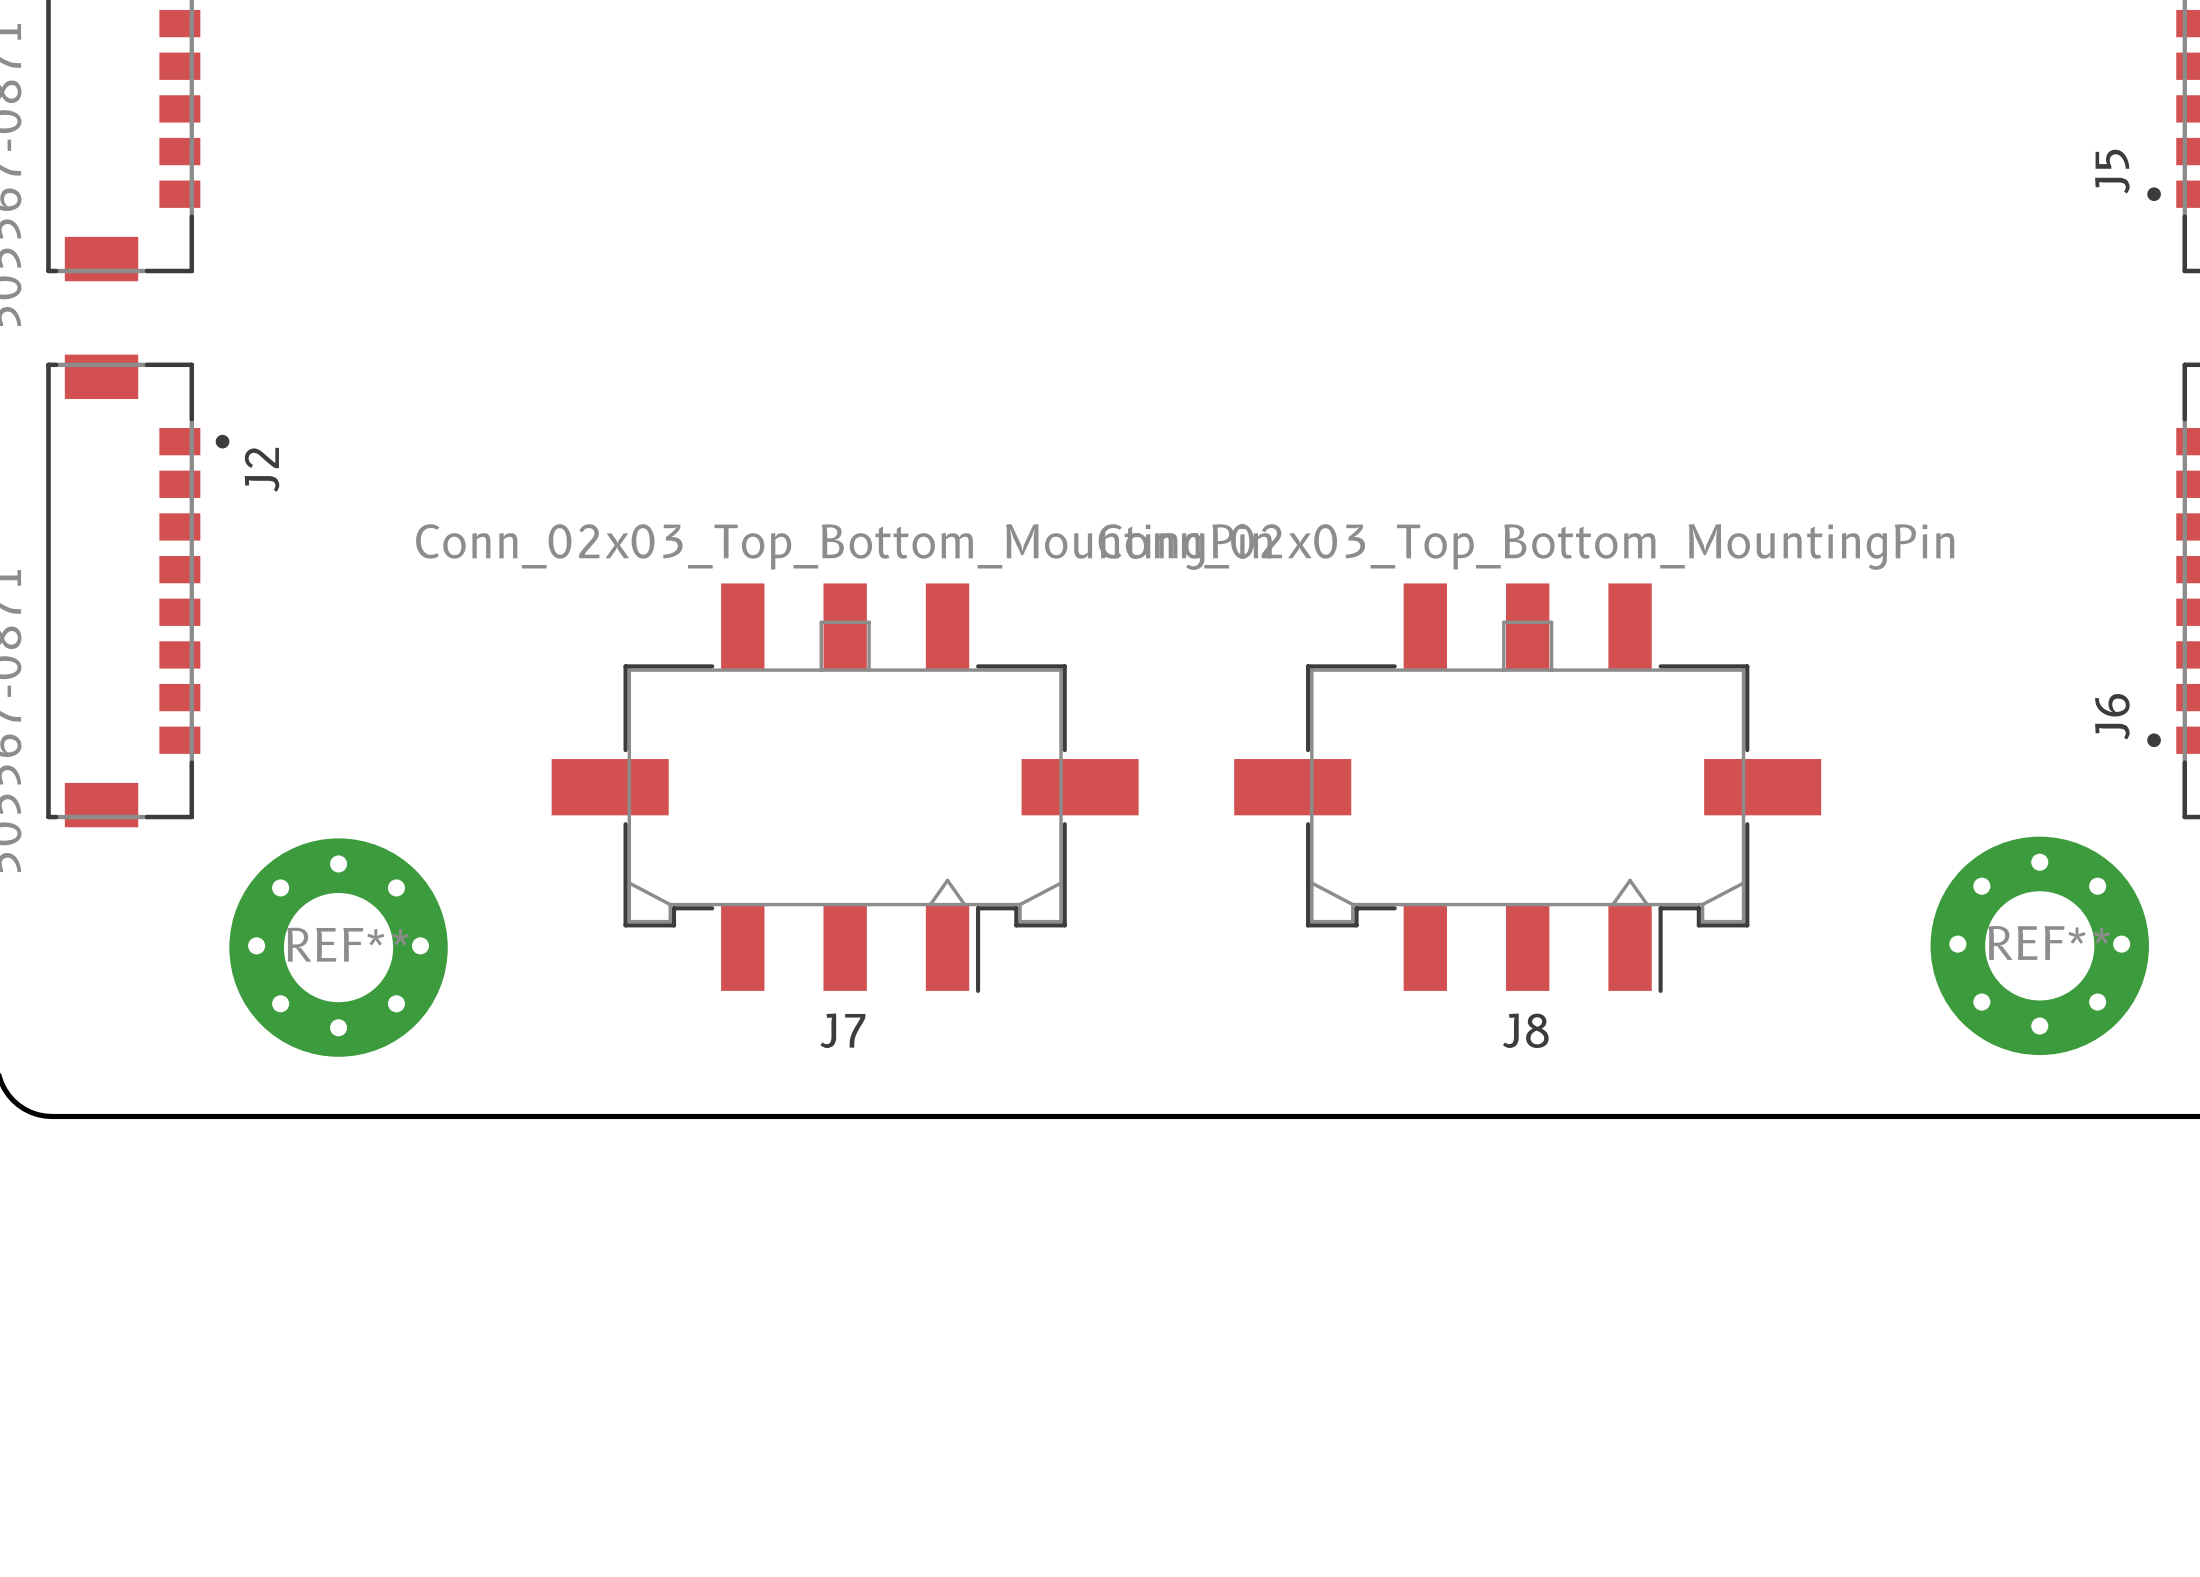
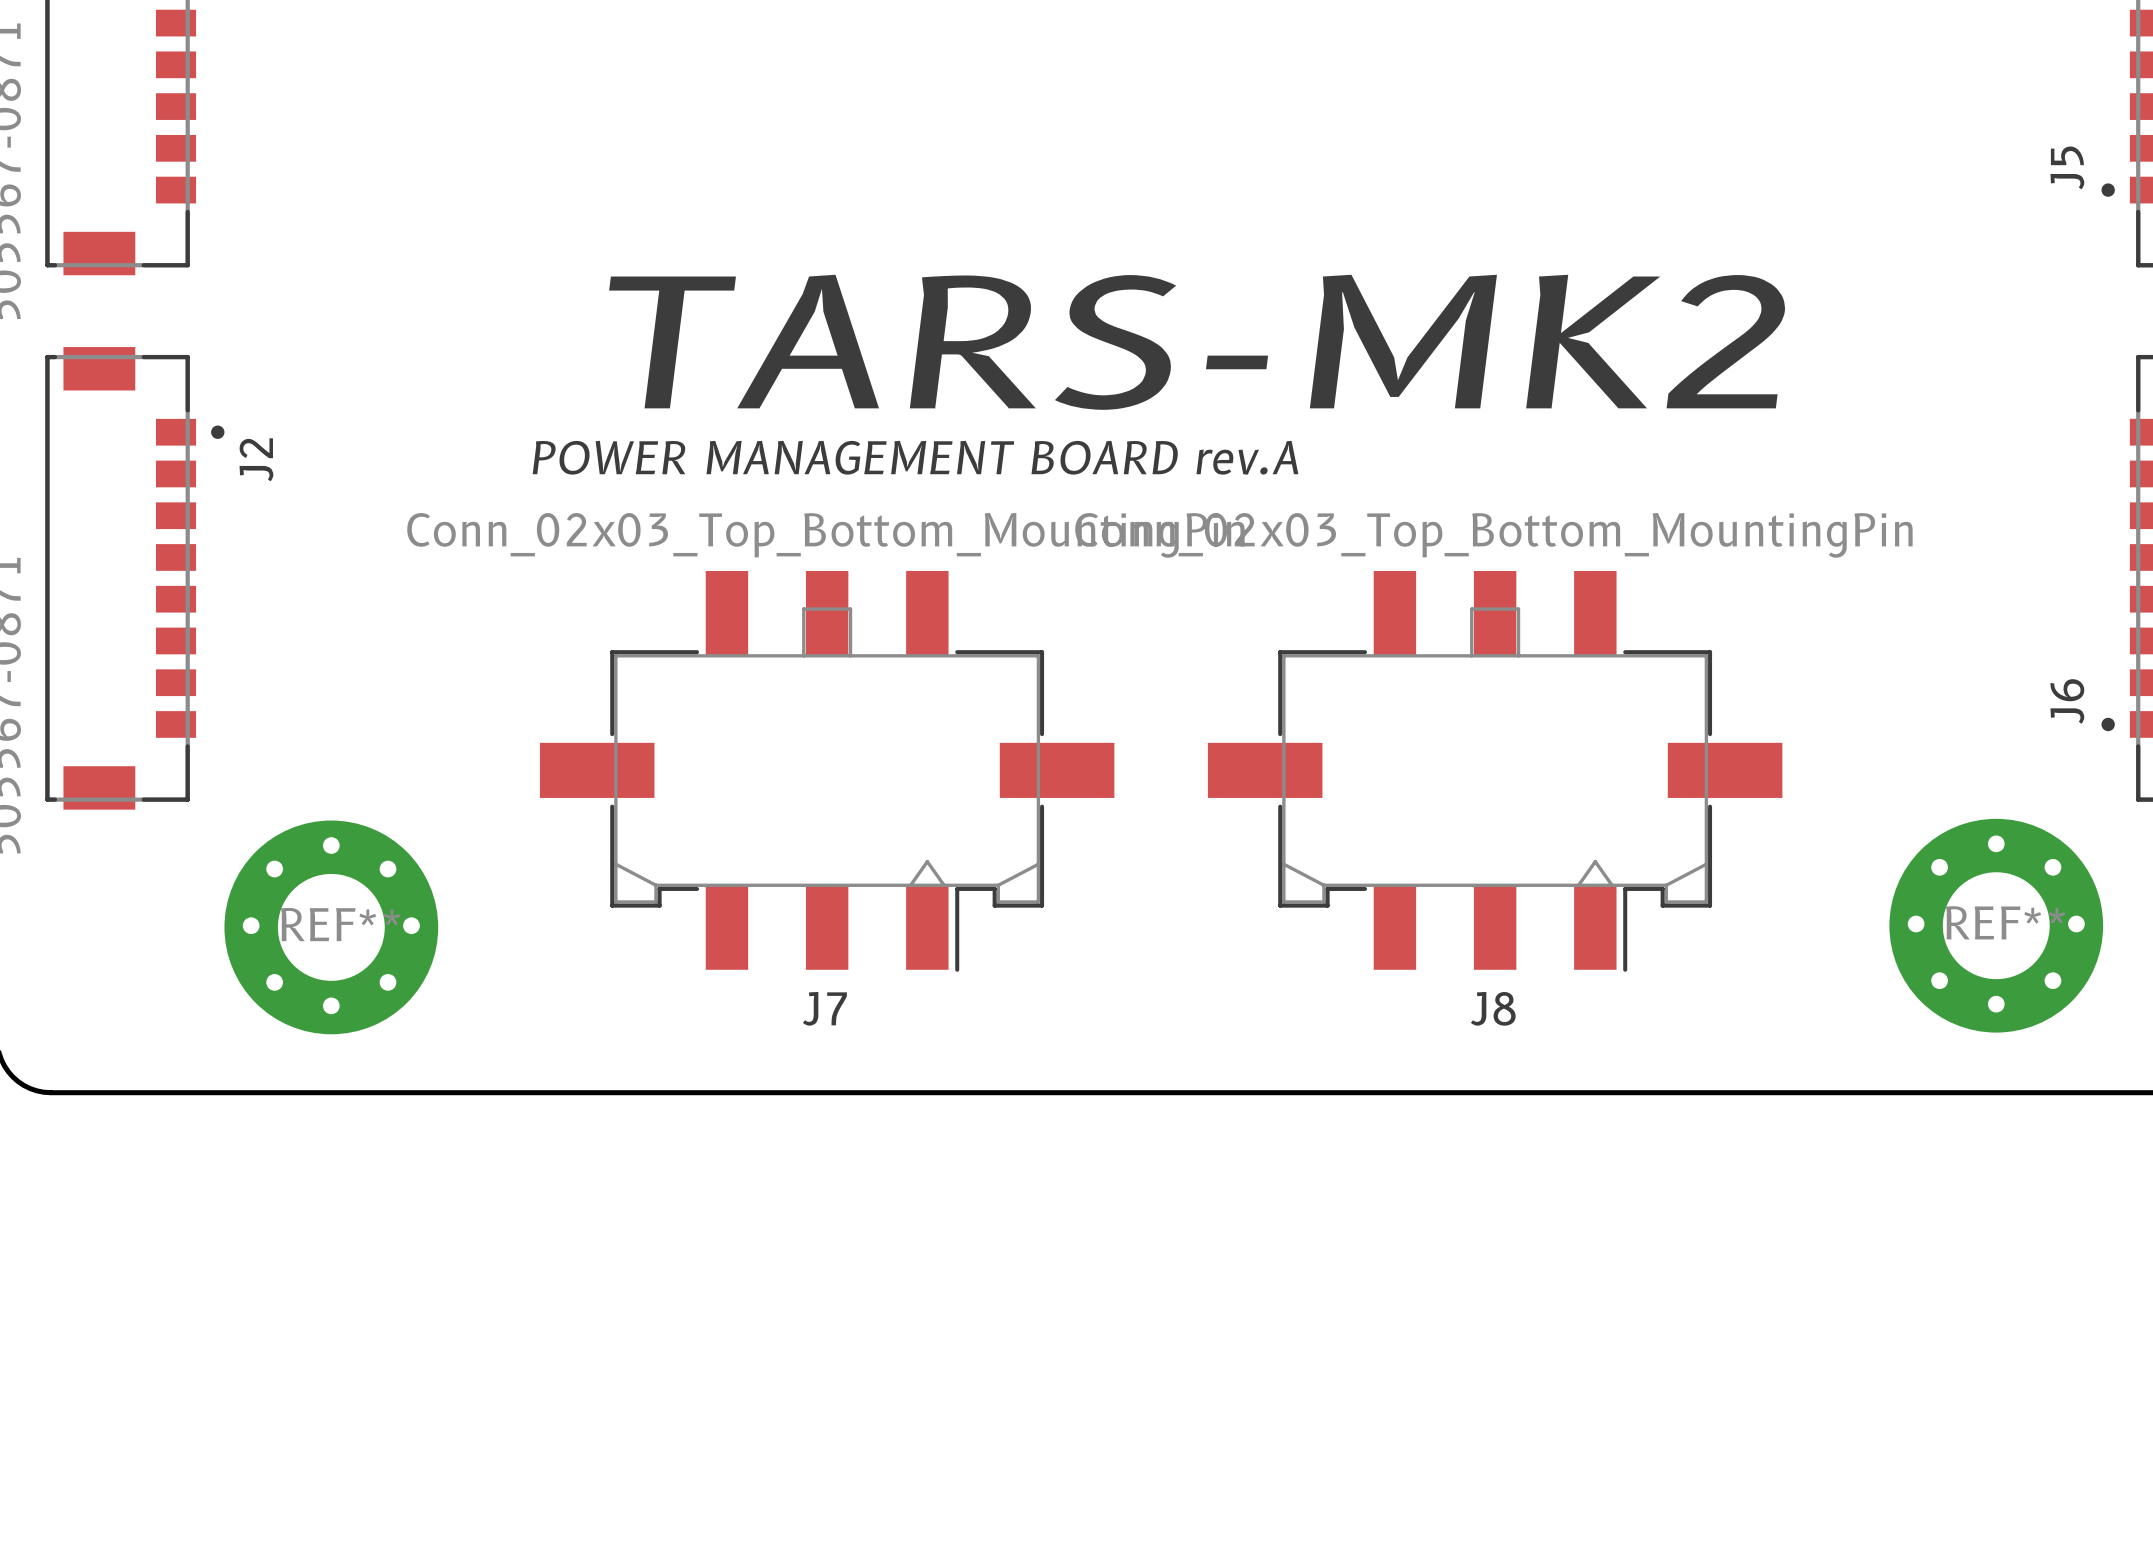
text: none -> TARS-MK2 (1197, 342)
text: none -> POWER MANAGEMENT BOARD rev.A (915, 457)

